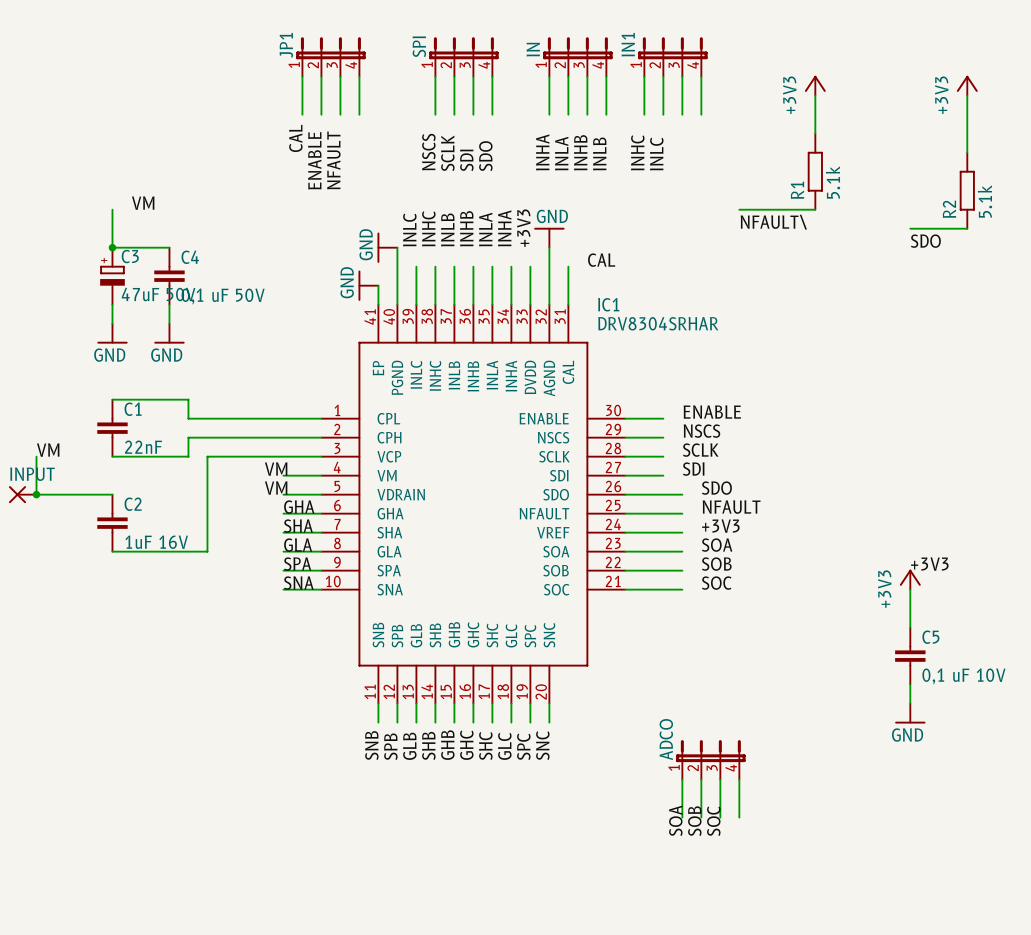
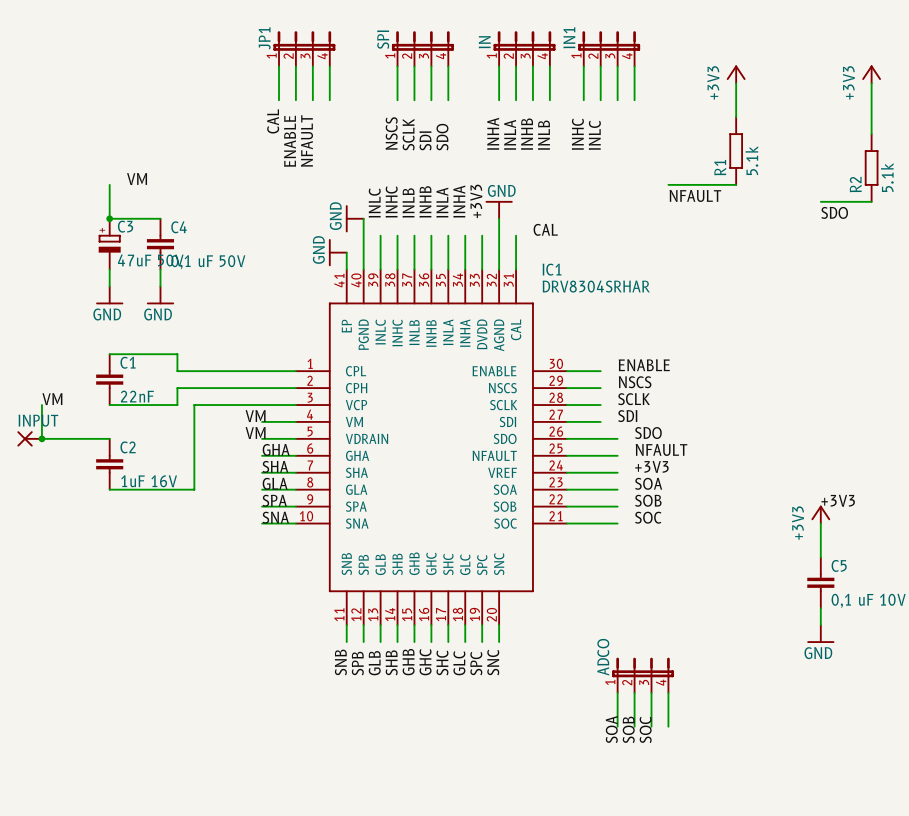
label: NFAULT\ (773, 222) -> NFAULT (695, 195)

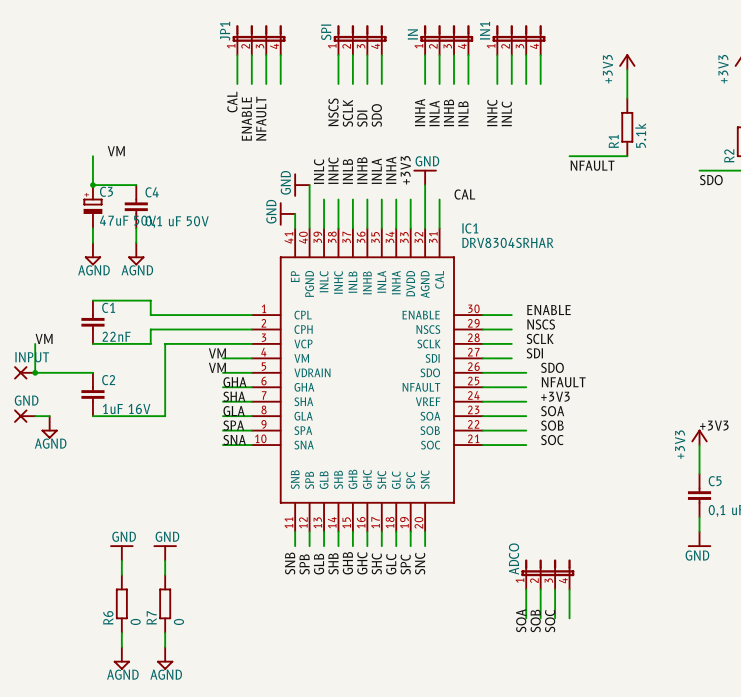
power symbol: GND (109, 295) -> AGND (92, 254)
power symbol: GND (160, 295) -> AGND (136, 254)
GND: none -> (24, 416)
wire: none -> (35, 416) (49, 416)
power symbol: none -> AGND (49, 427)
power symbol: none -> GND (121, 552)
power symbol: none -> GND (165, 552)
wire: none -> (121, 560) (121, 575)
wire: none -> (165, 560) (165, 575)
R6: none -> 0 (121, 603)
R7: none -> 0 (165, 603)
wire: none -> (121, 632) (121, 647)
wire: none -> (165, 632) (165, 647)
power symbol: none -> AGND (121, 658)
power symbol: none -> AGND (165, 658)

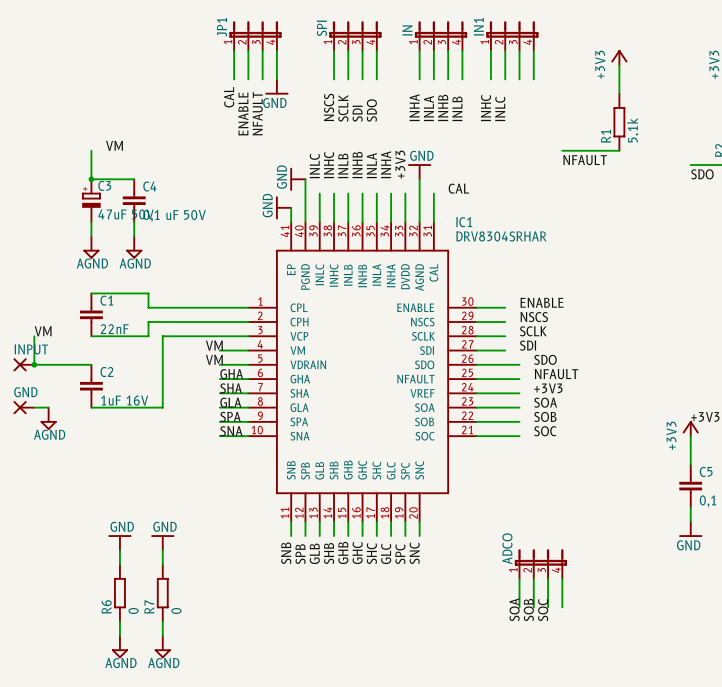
power symbol: none -> GND (276, 86)

